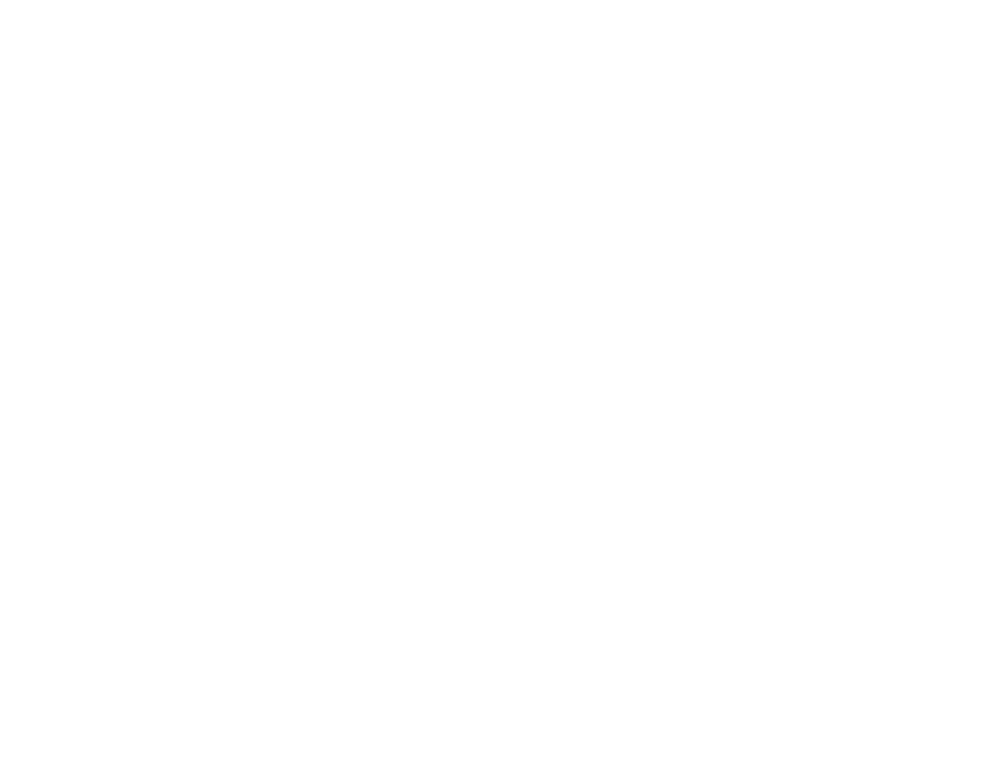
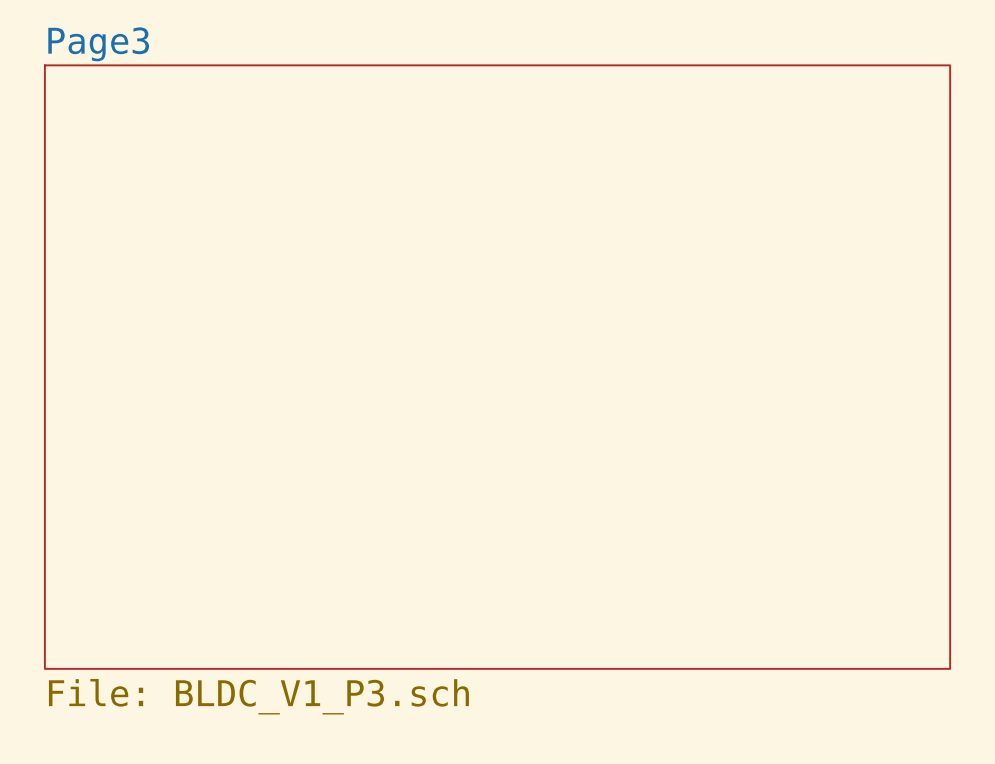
sheet Page3: none -> File: BLDC_V1_P3.sch (497, 367)

